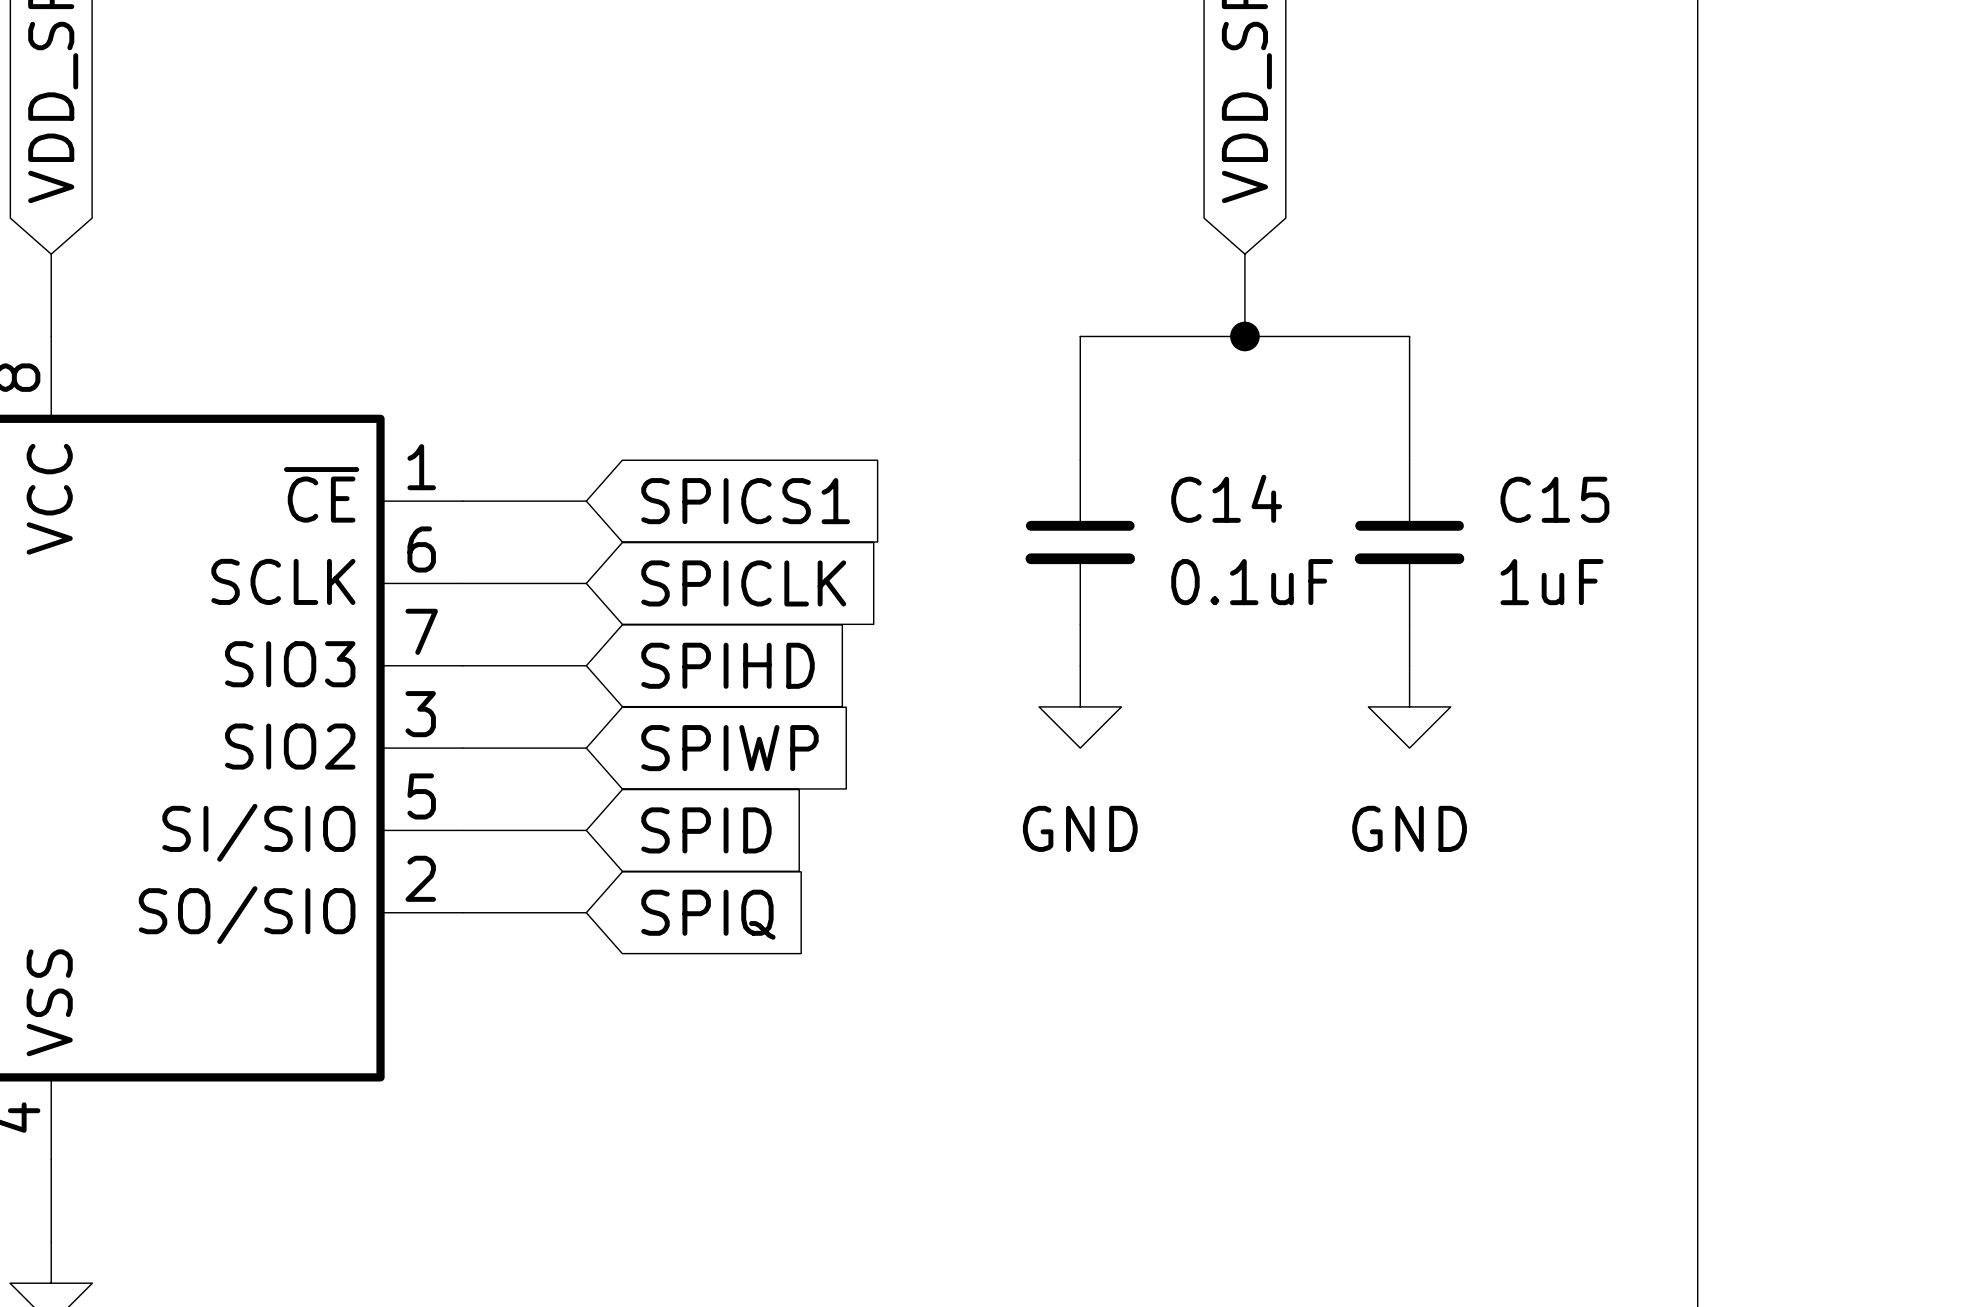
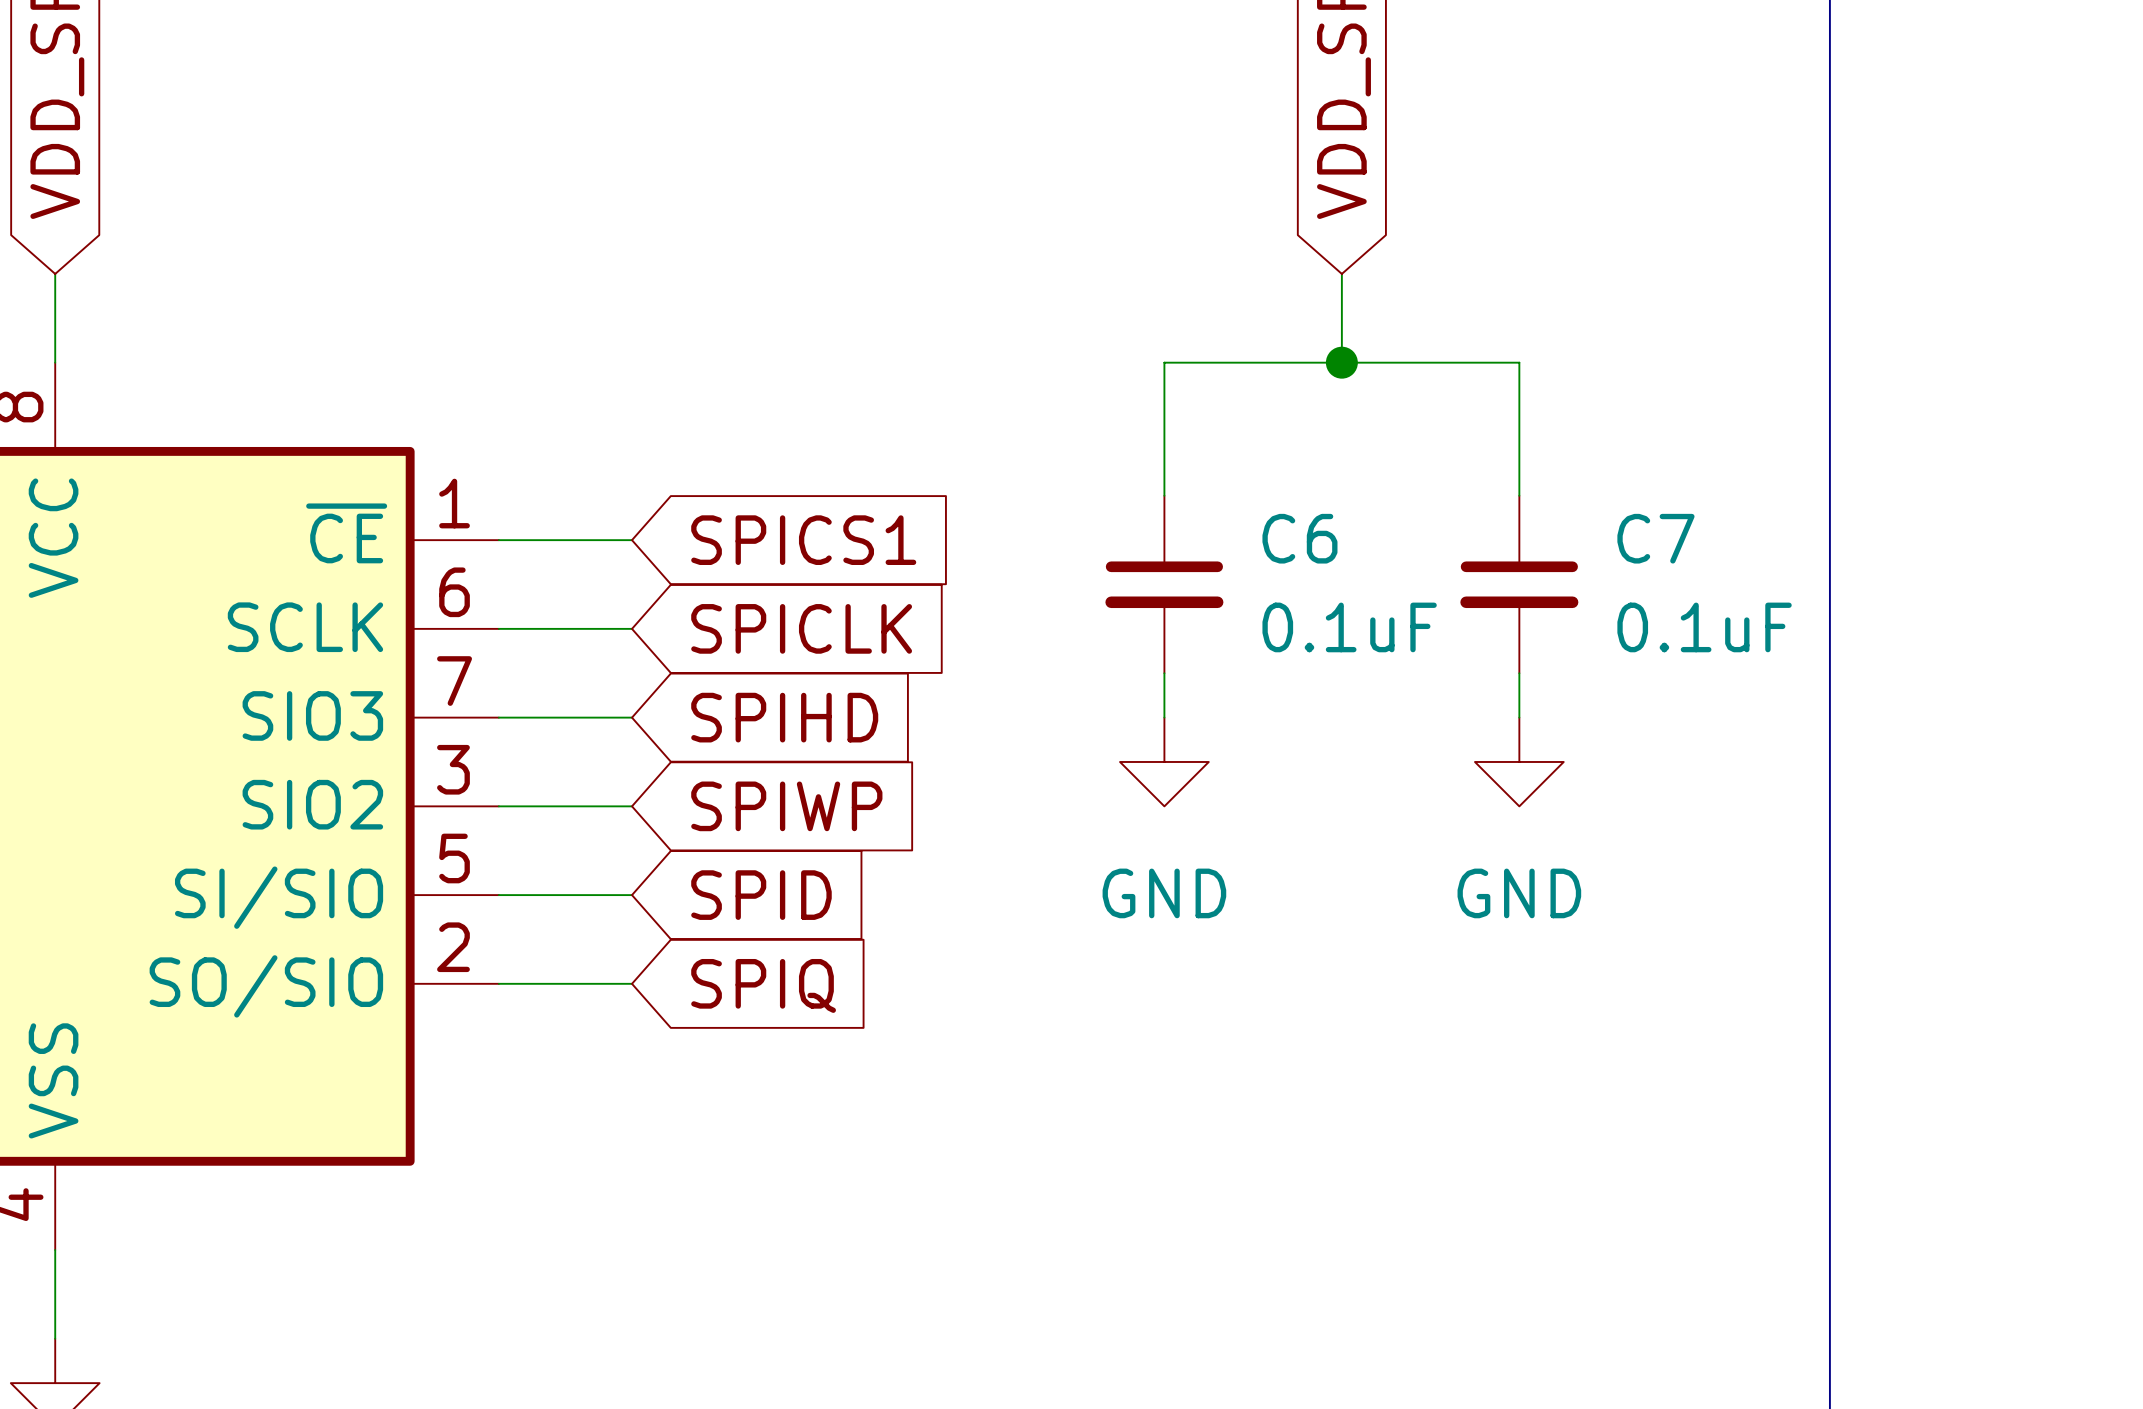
C14 name: C14 (1226, 498) -> C6 (1299, 538)
C15 name: C15 (1554, 499) -> C7 (1655, 538)
C15 value: 1uF (1551, 582) -> 0.1uF (1704, 627)

